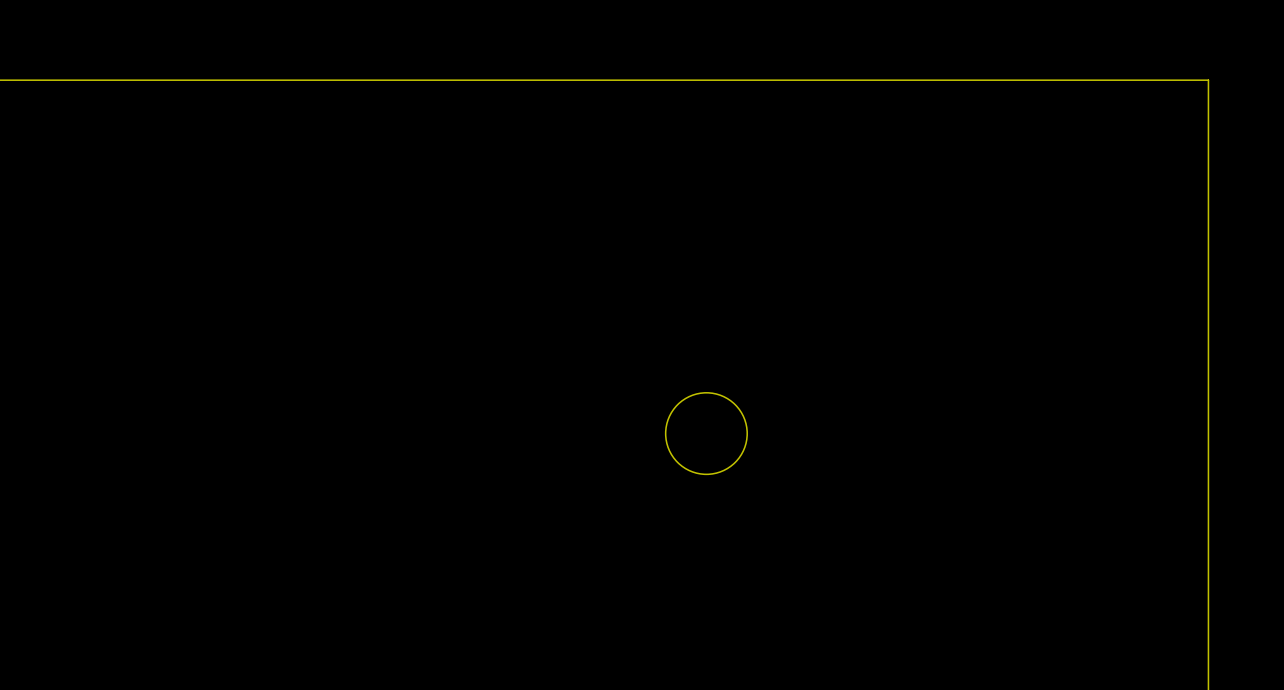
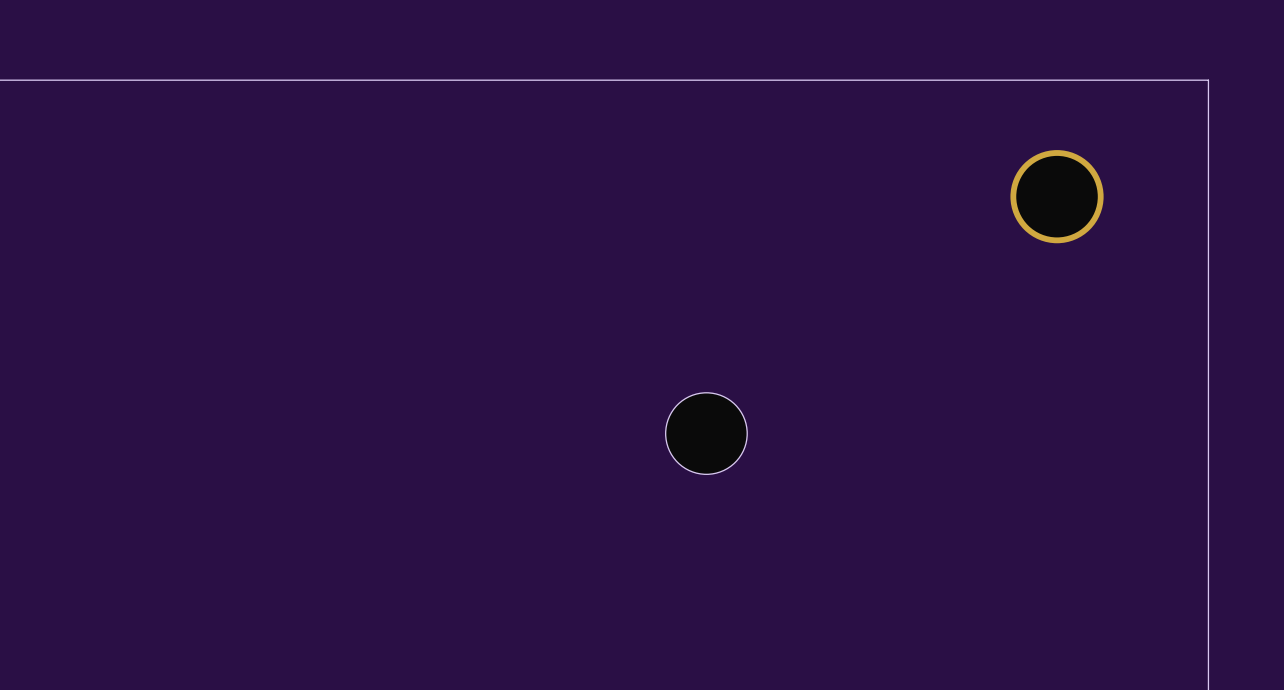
via: none -> (1057, 196)

